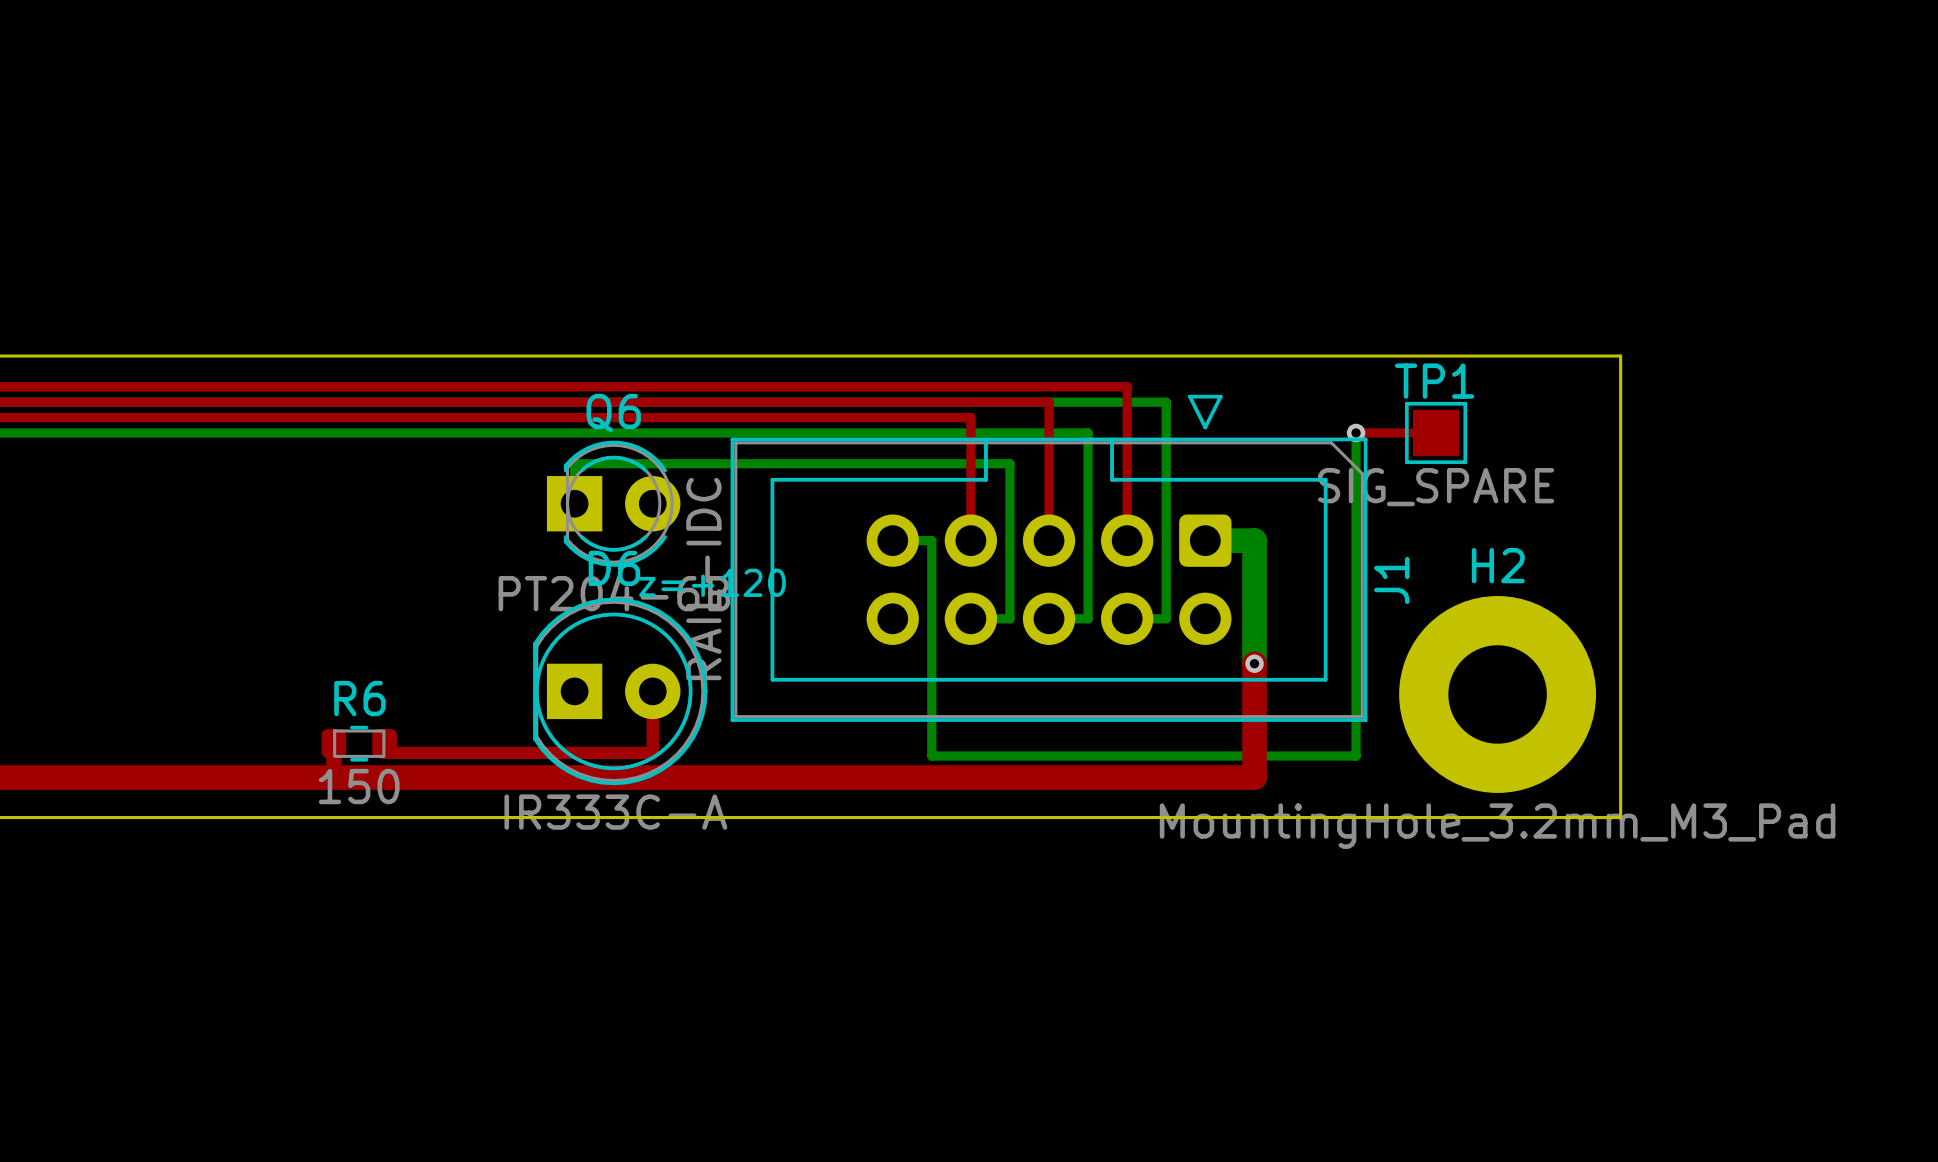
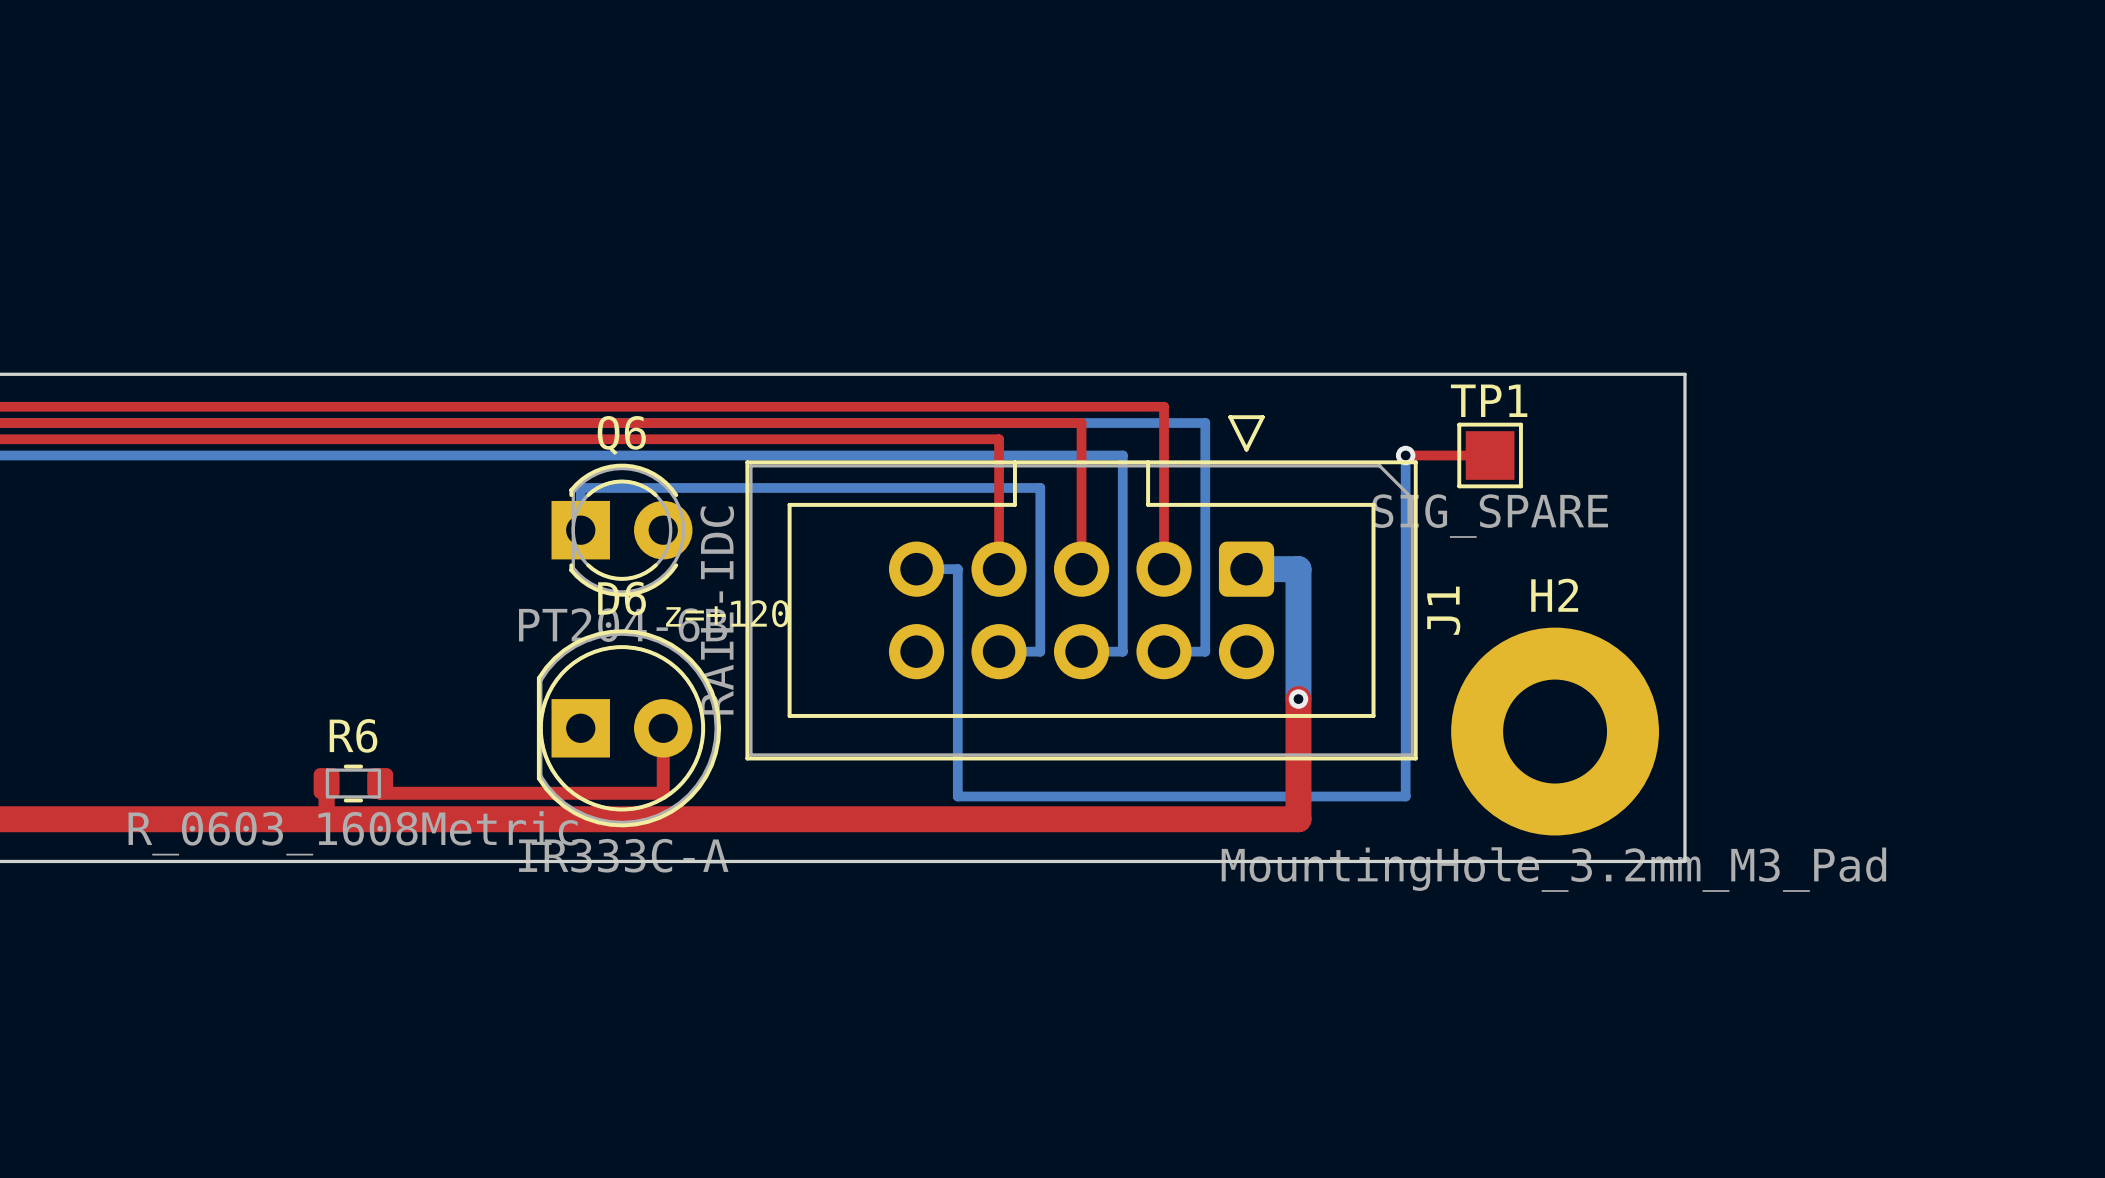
R6 value: 150 (359, 786) -> R_0603_1608Metric (353, 833)

